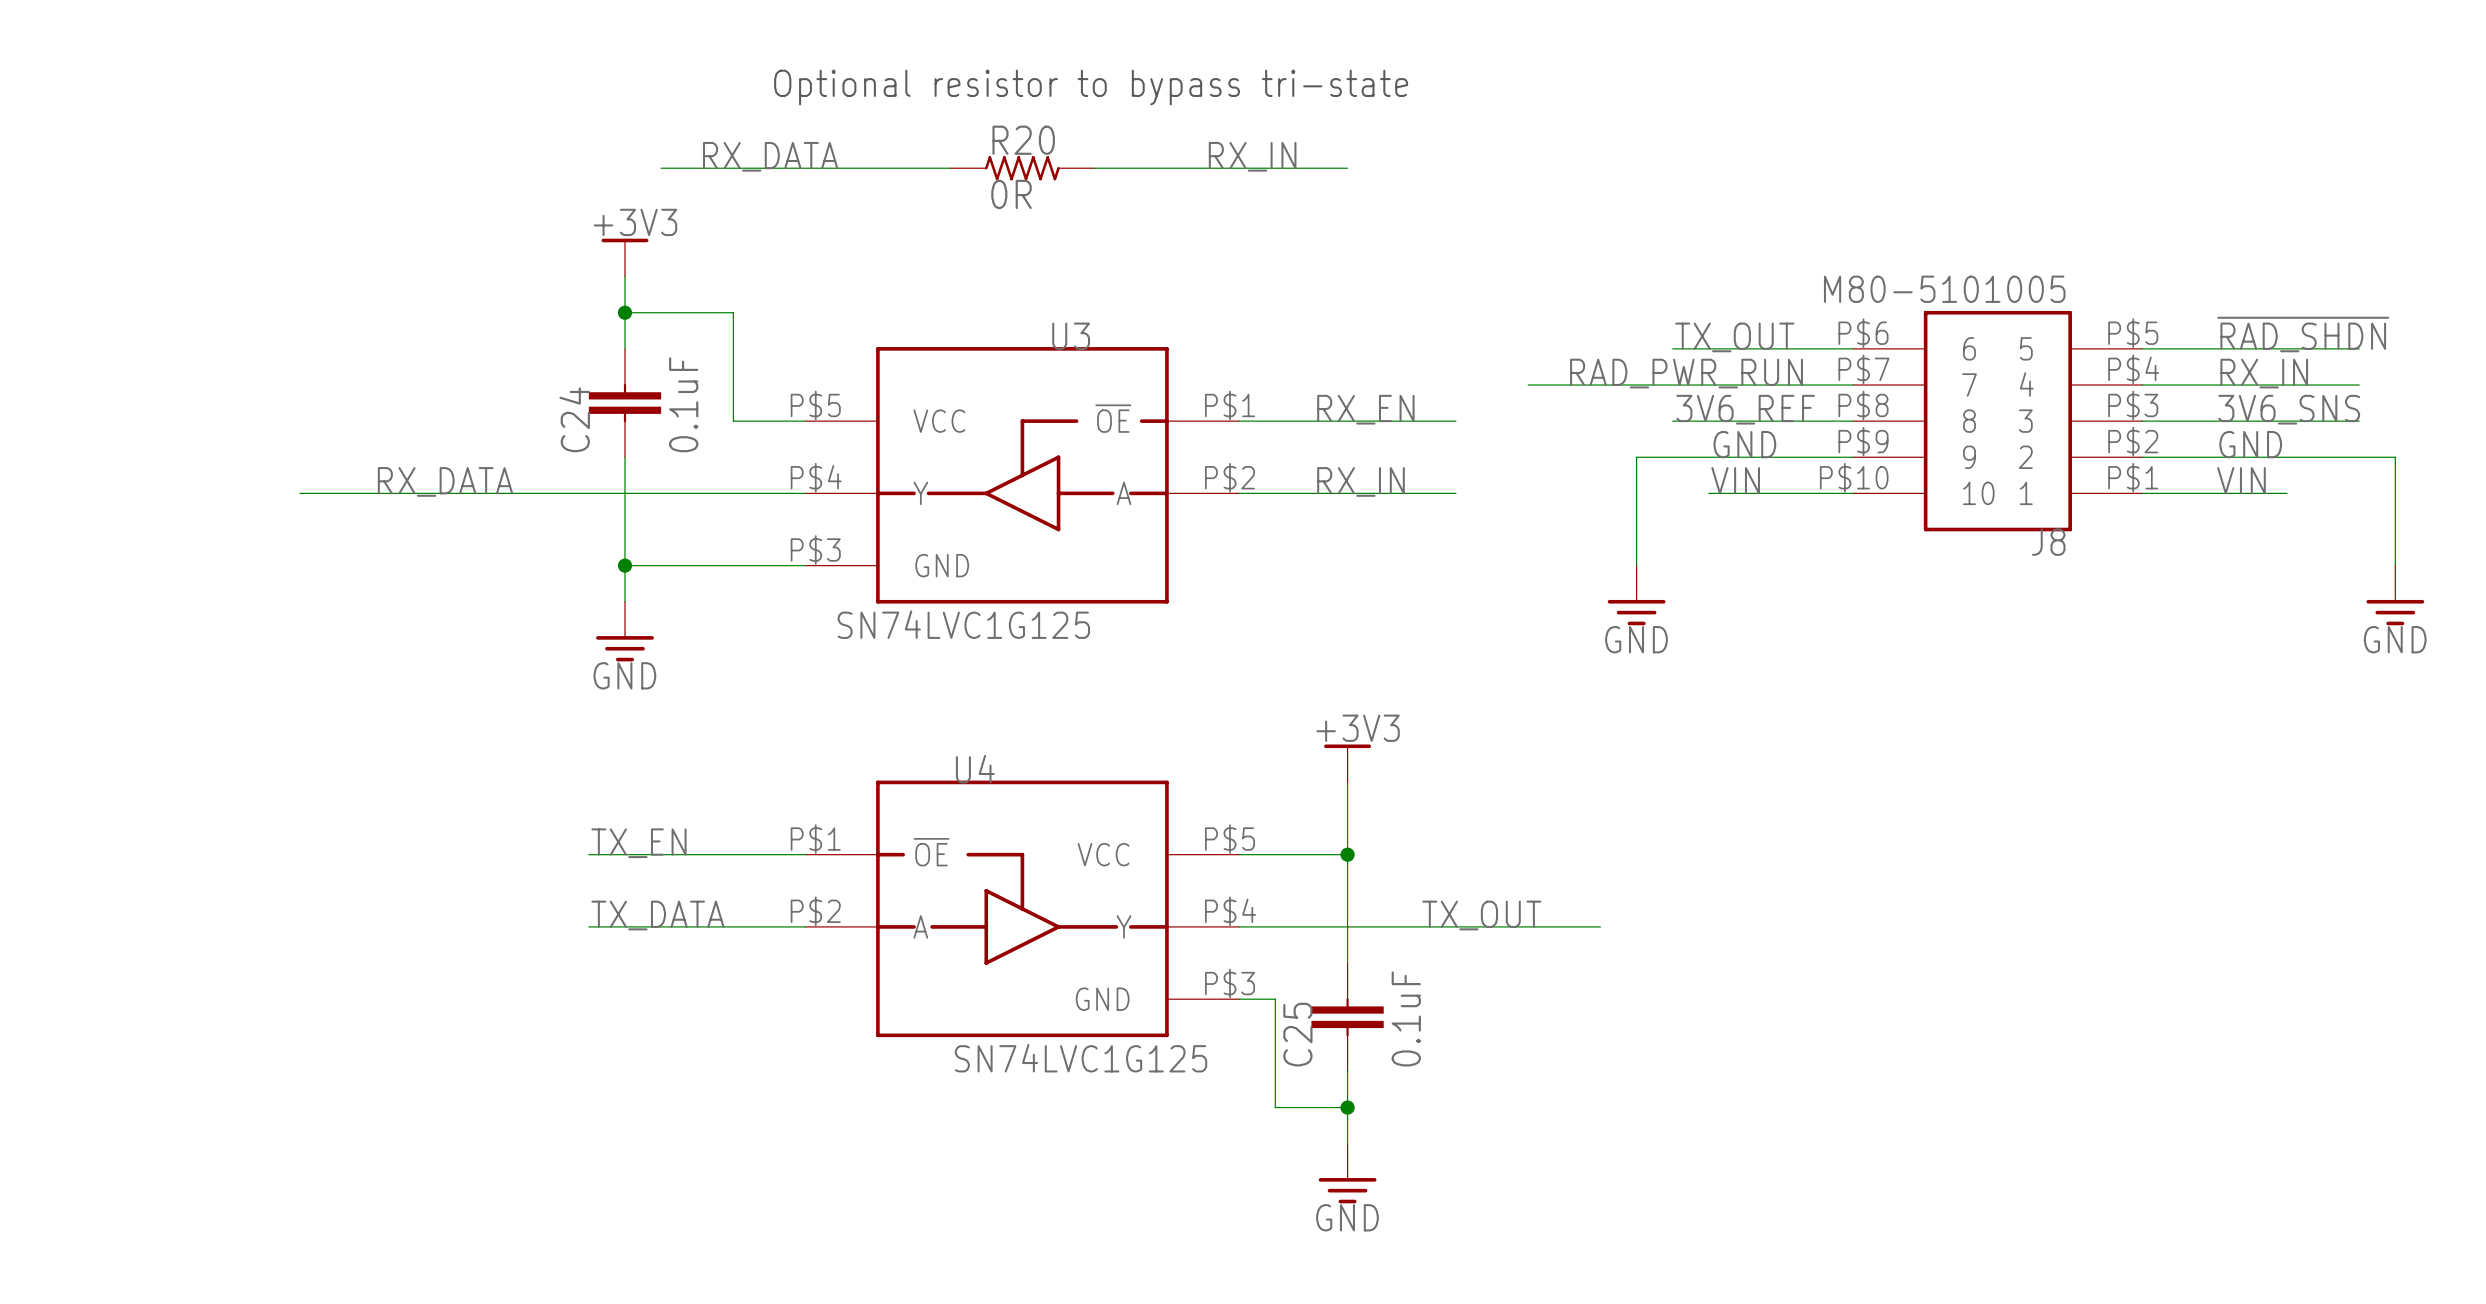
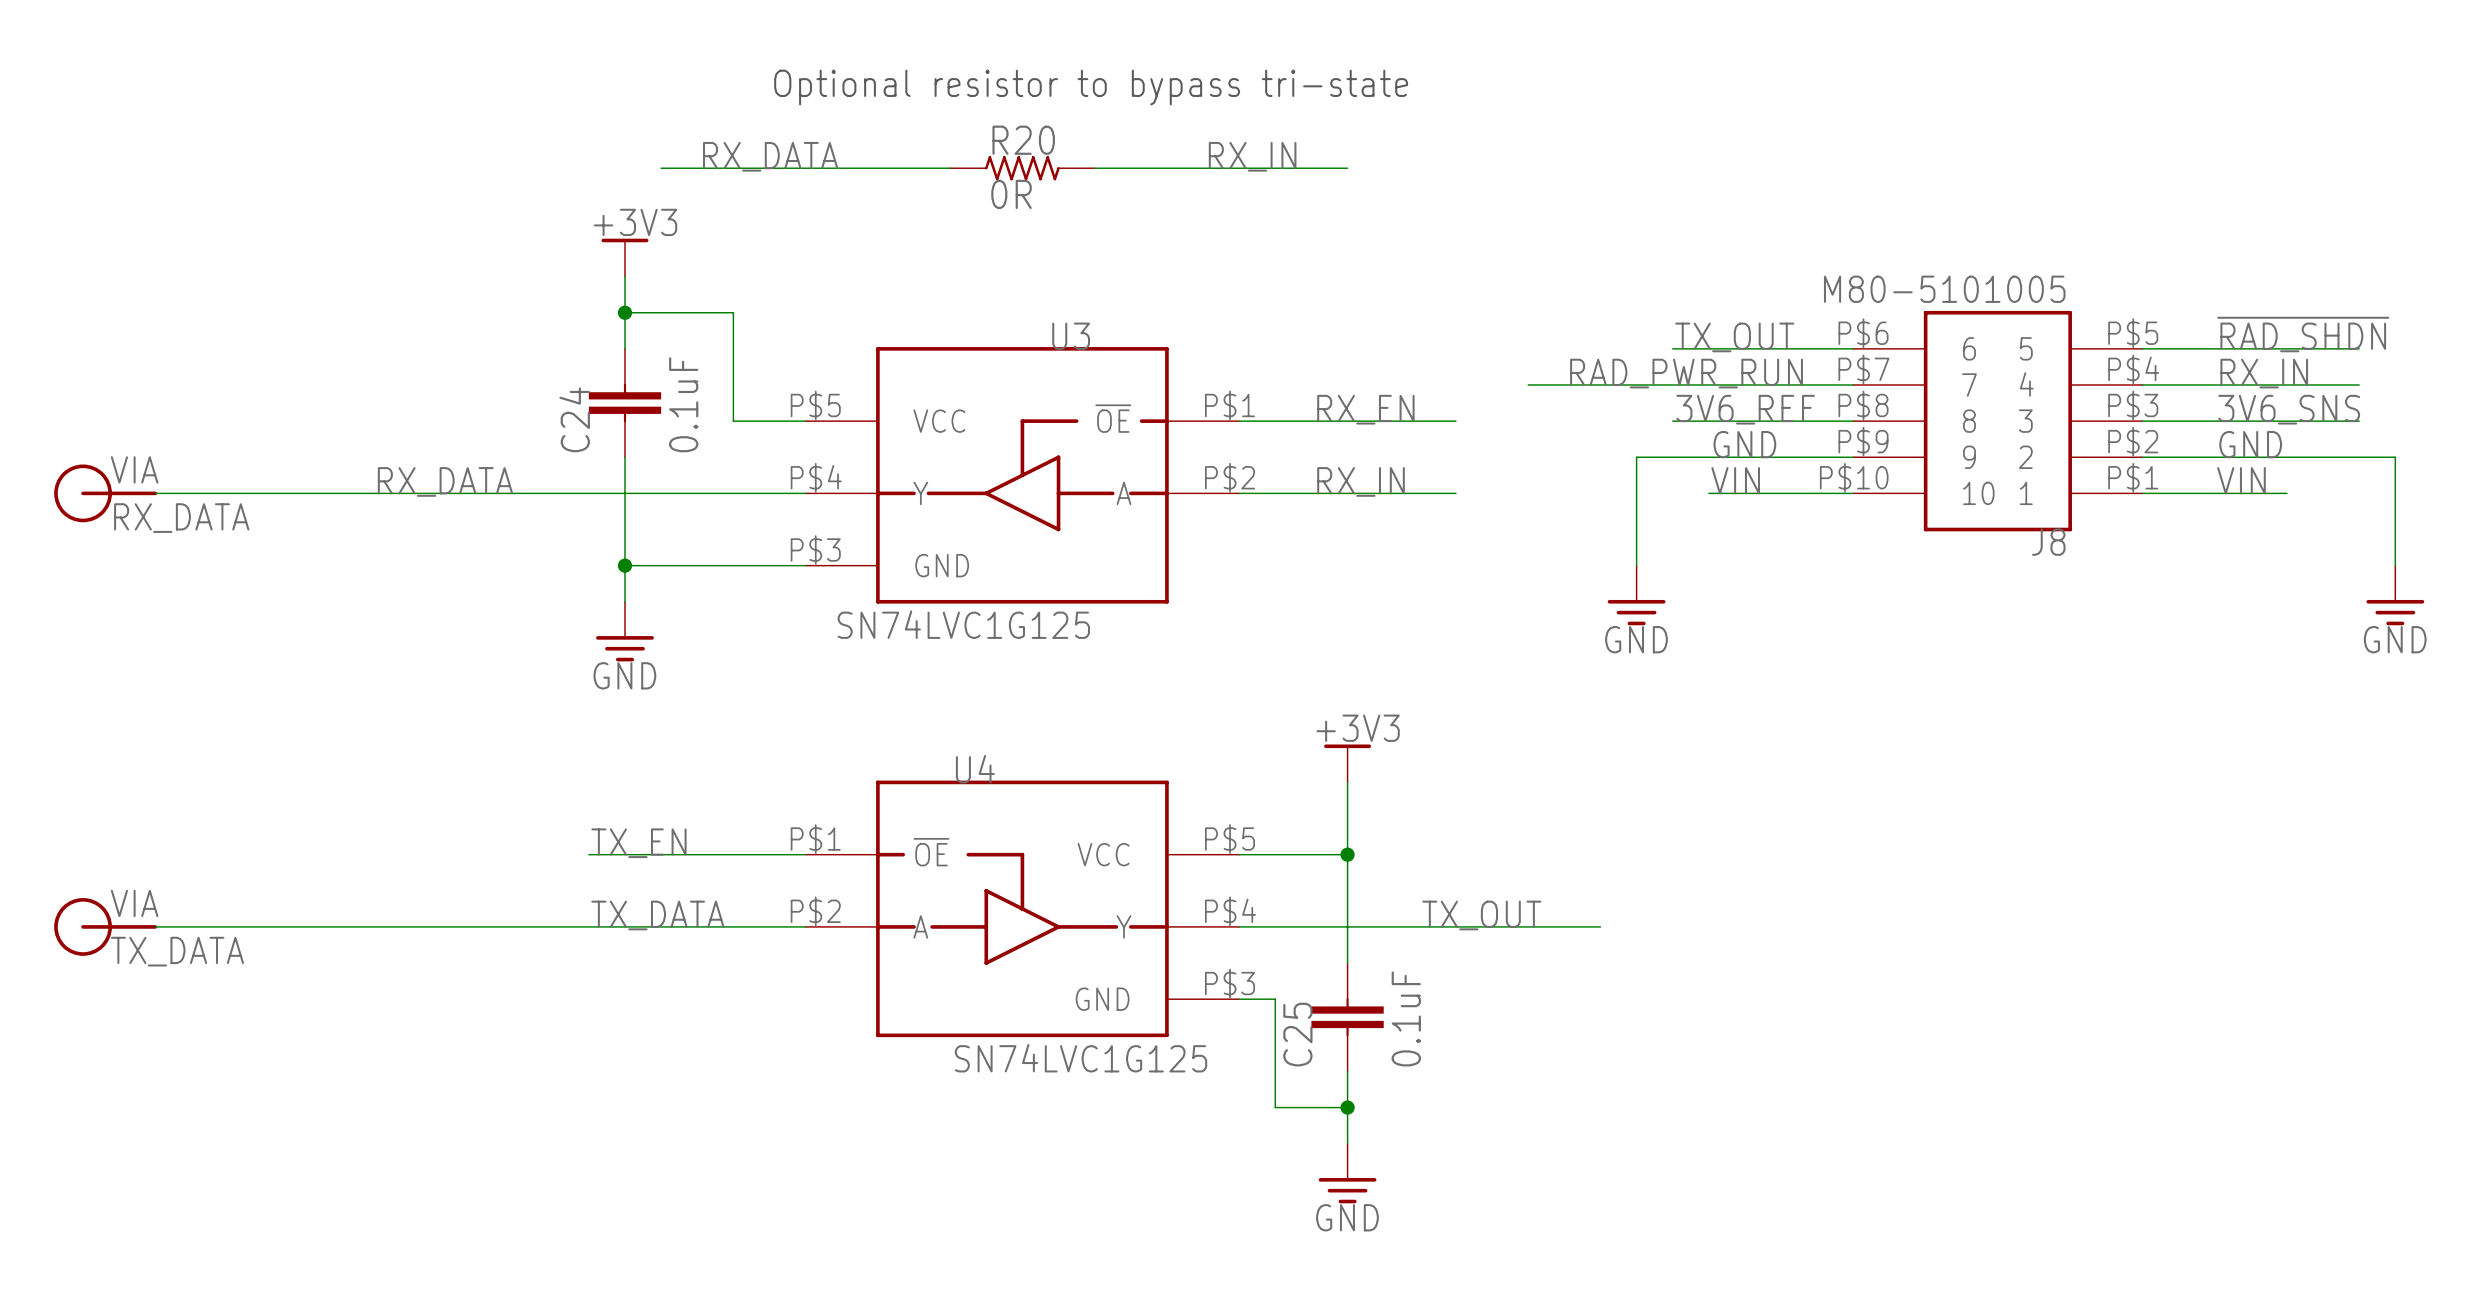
part: none -> RX_DATA (105, 493)
wire: none -> (155, 493) (299, 493)
part: none -> TX_DATA (105, 926)
wire: none -> (155, 926) (588, 926)

